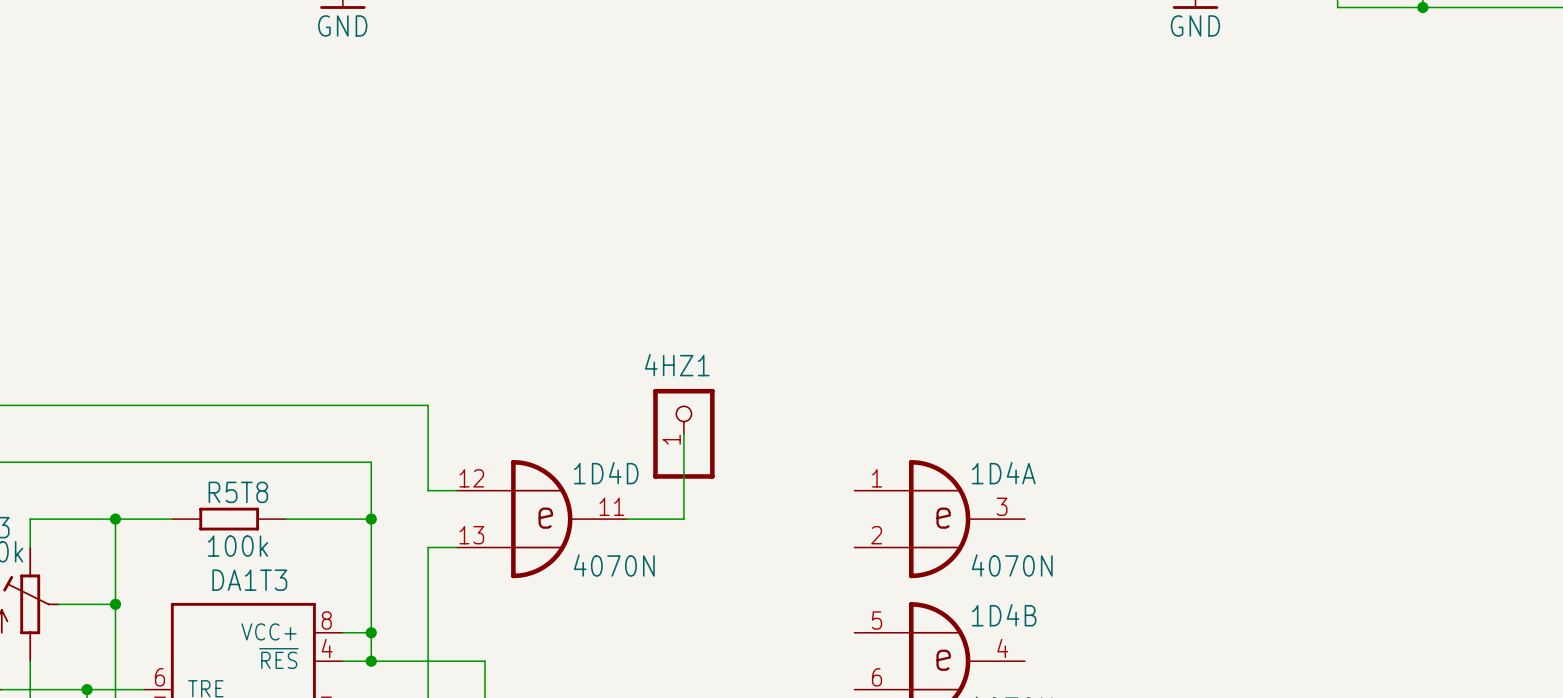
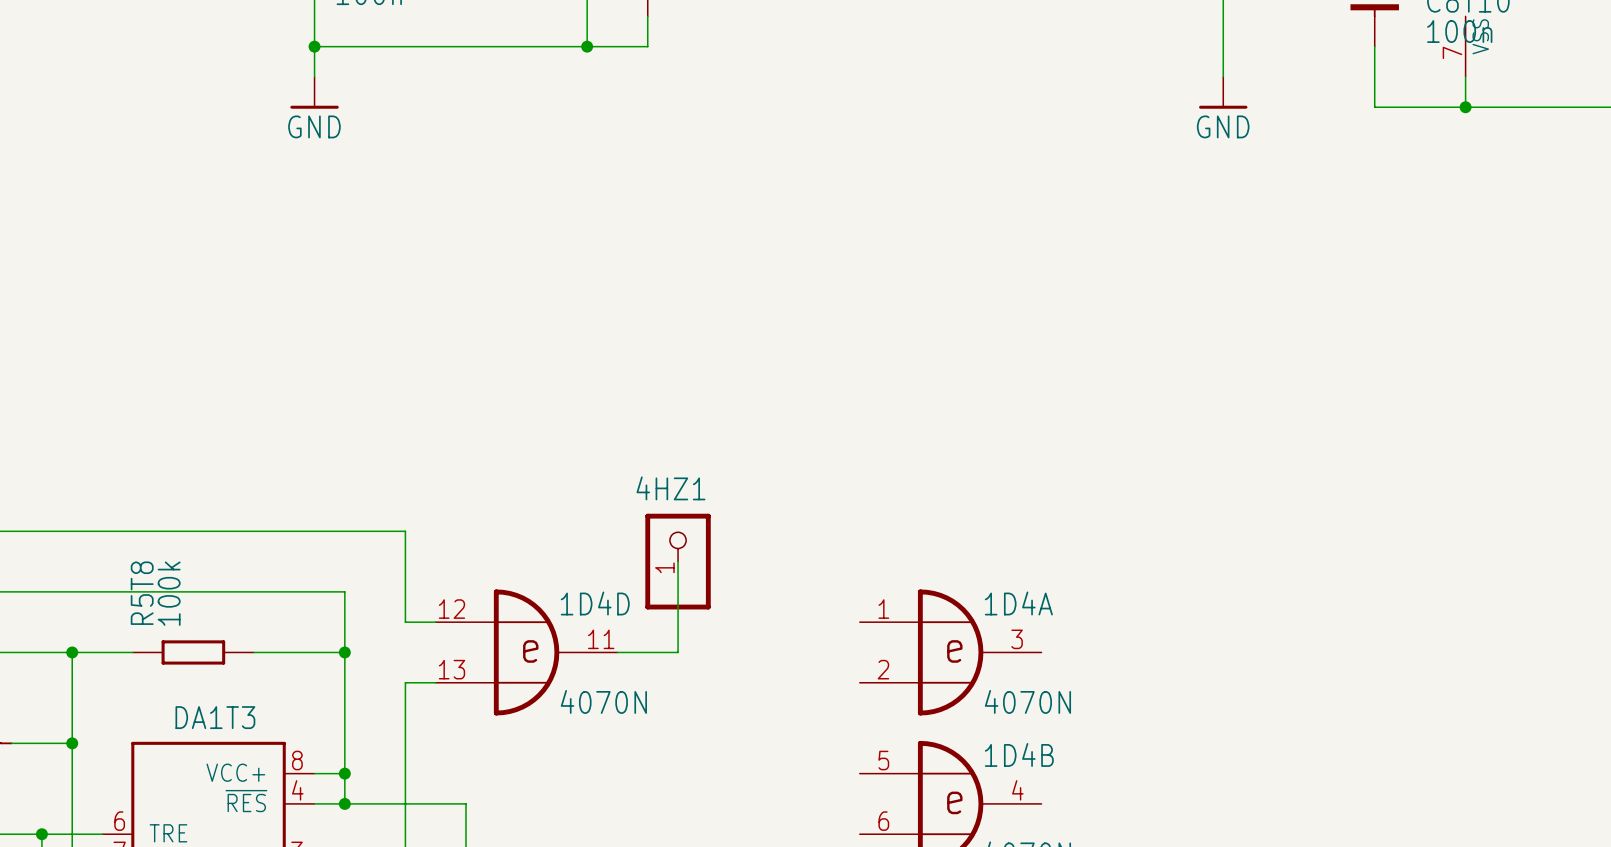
R5T8 name rotation: 0° (238, 492) -> 90° counterclockwise (142, 593)
R5T8 value rotation: 0° (237, 546) -> 90° counterclockwise (169, 593)
R5T8 value position: 100k (237, 546) -> 100k (169, 593)

